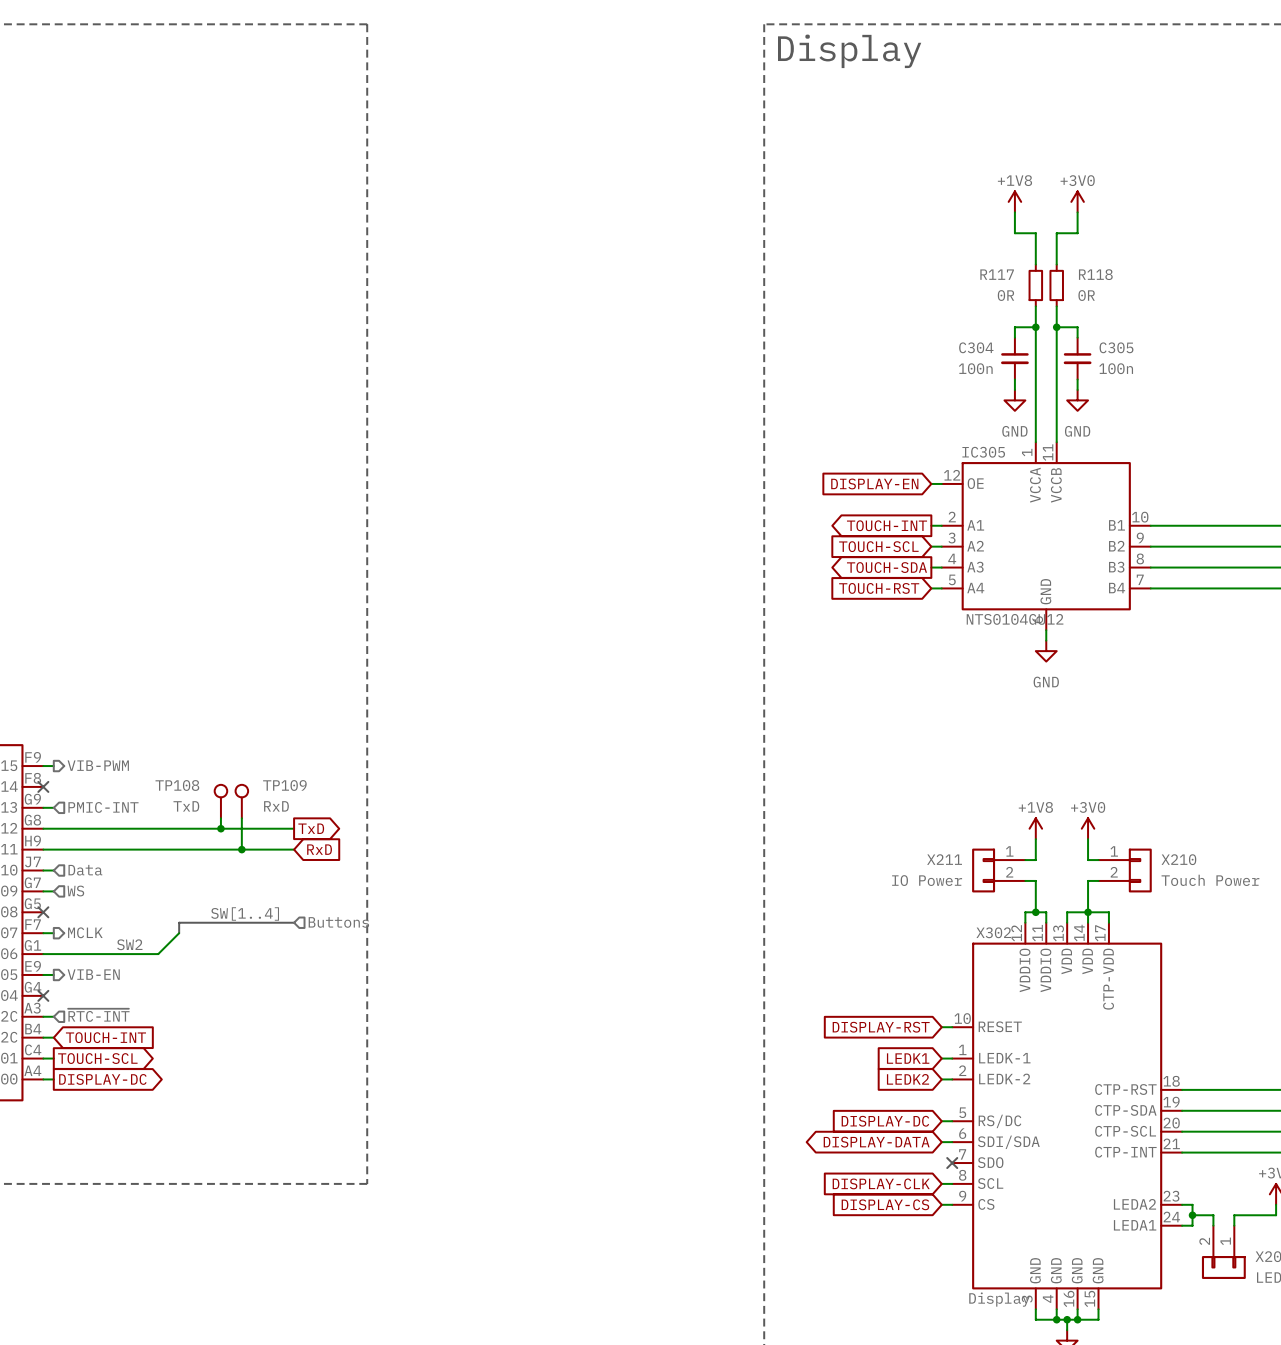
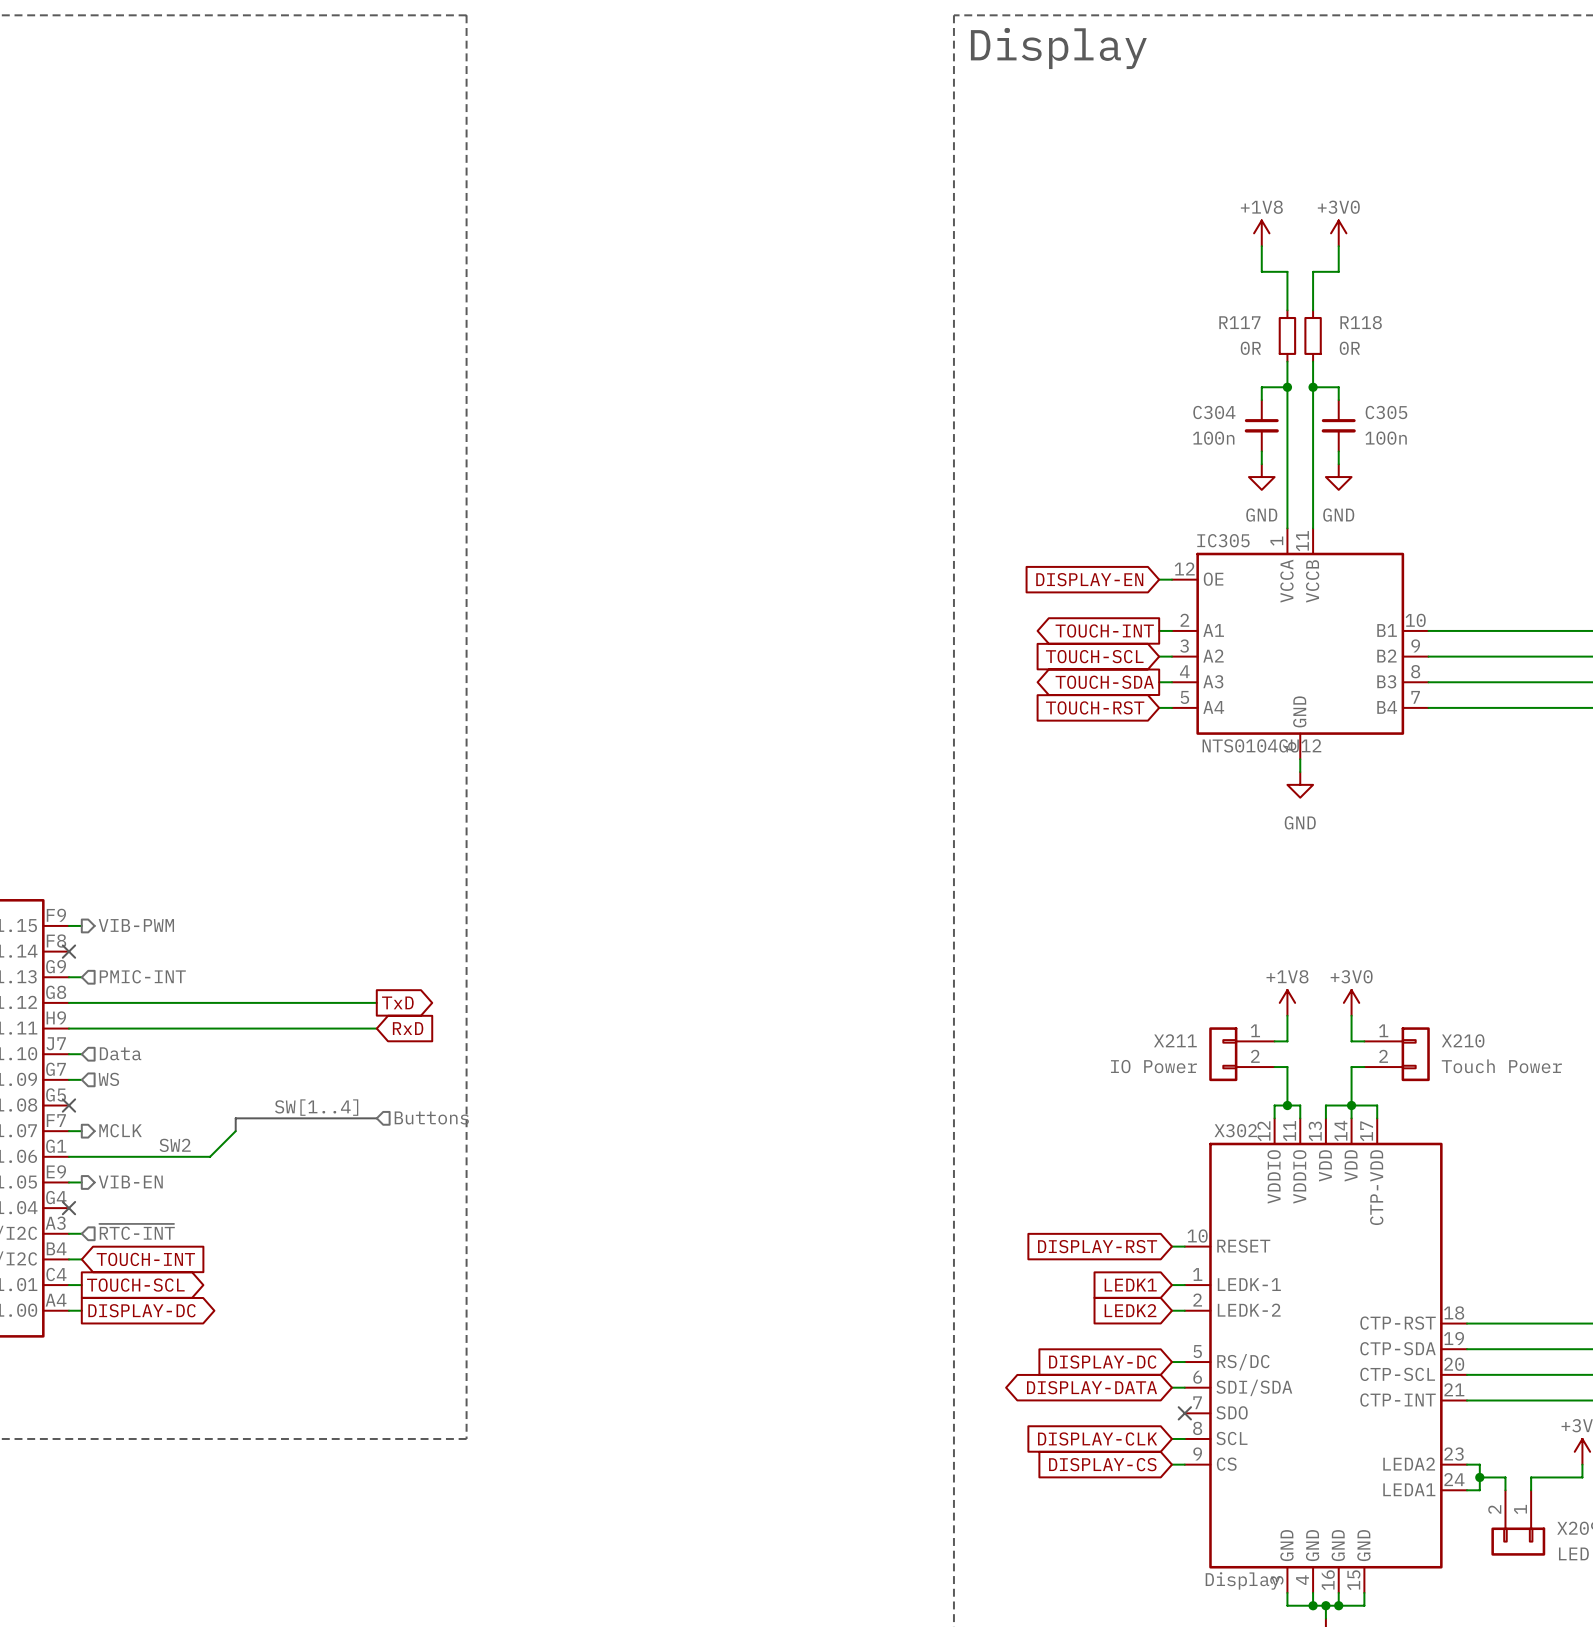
TP108: TxD (220, 801) -> none
TP109: RxD (241, 801) -> none
wire: (220, 818) (220, 828) -> none
wire: (241, 818) (241, 849) -> none
junction: (220, 828) -> none
junction: (241, 849) -> none

